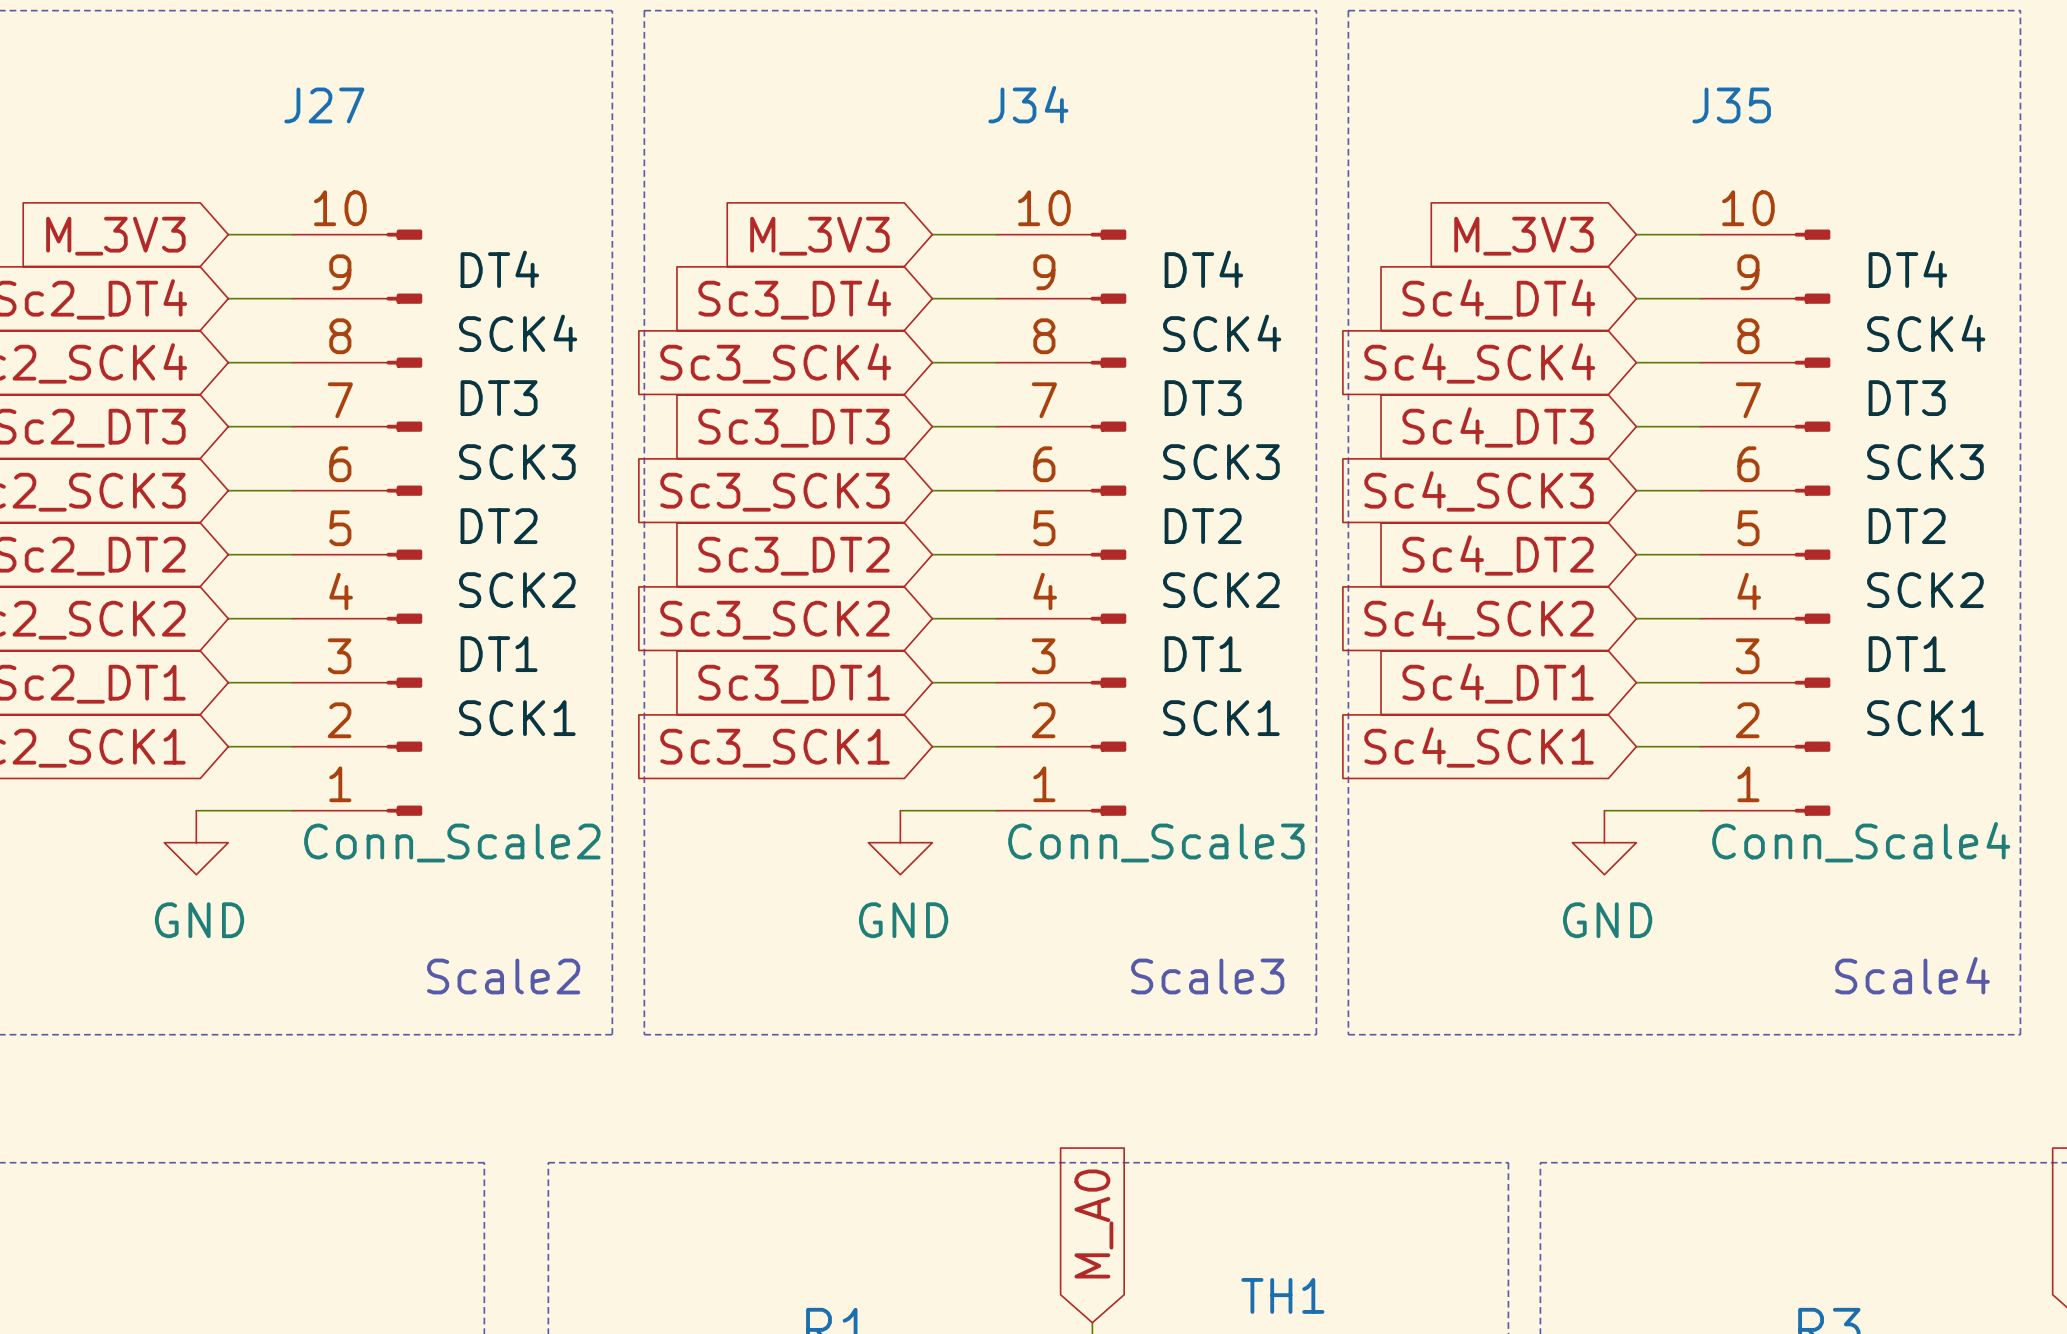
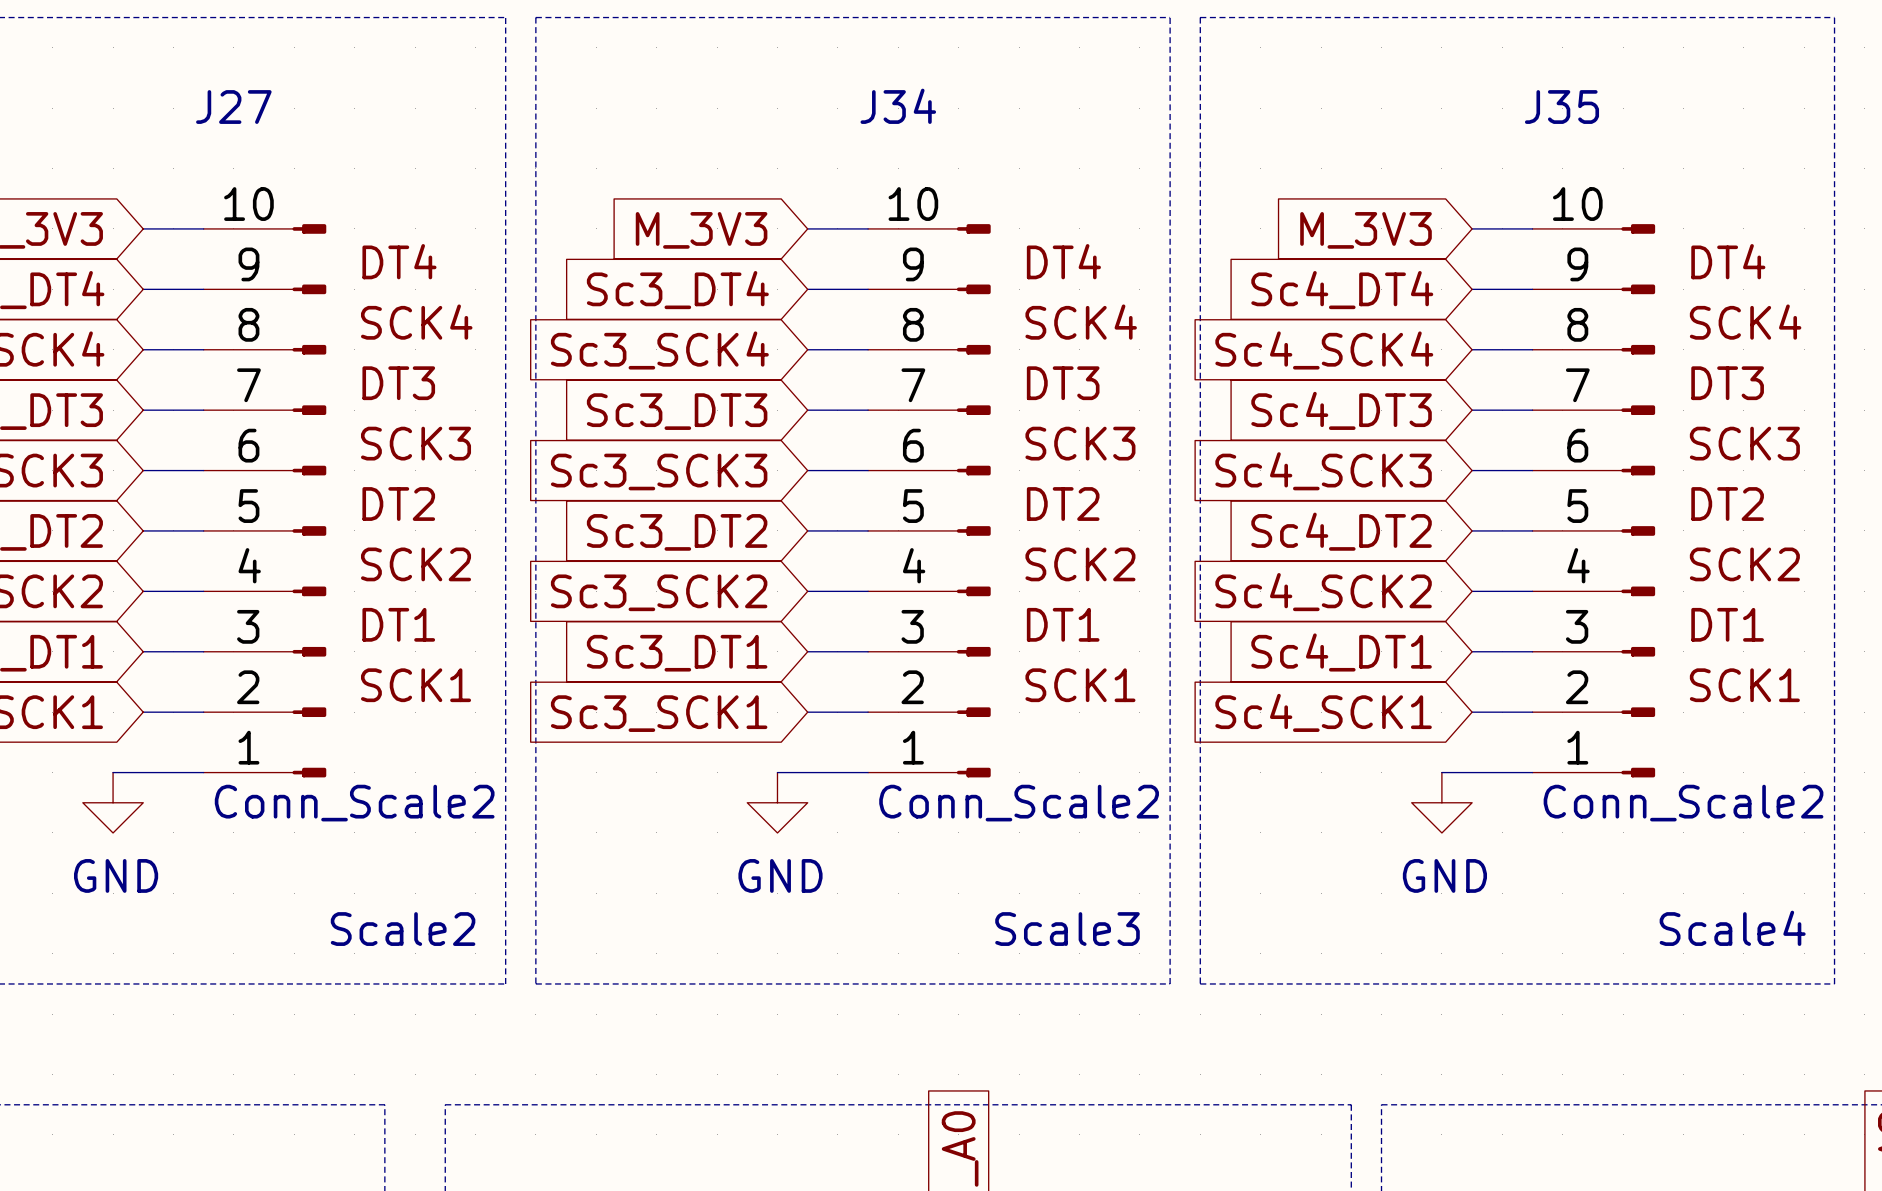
J35 value: Conn_Scale4 (1861, 842) -> Conn_Scale2 (1683, 803)
J34 value: Conn_Scale3 (1156, 843) -> Conn_Scale2 (1019, 803)

